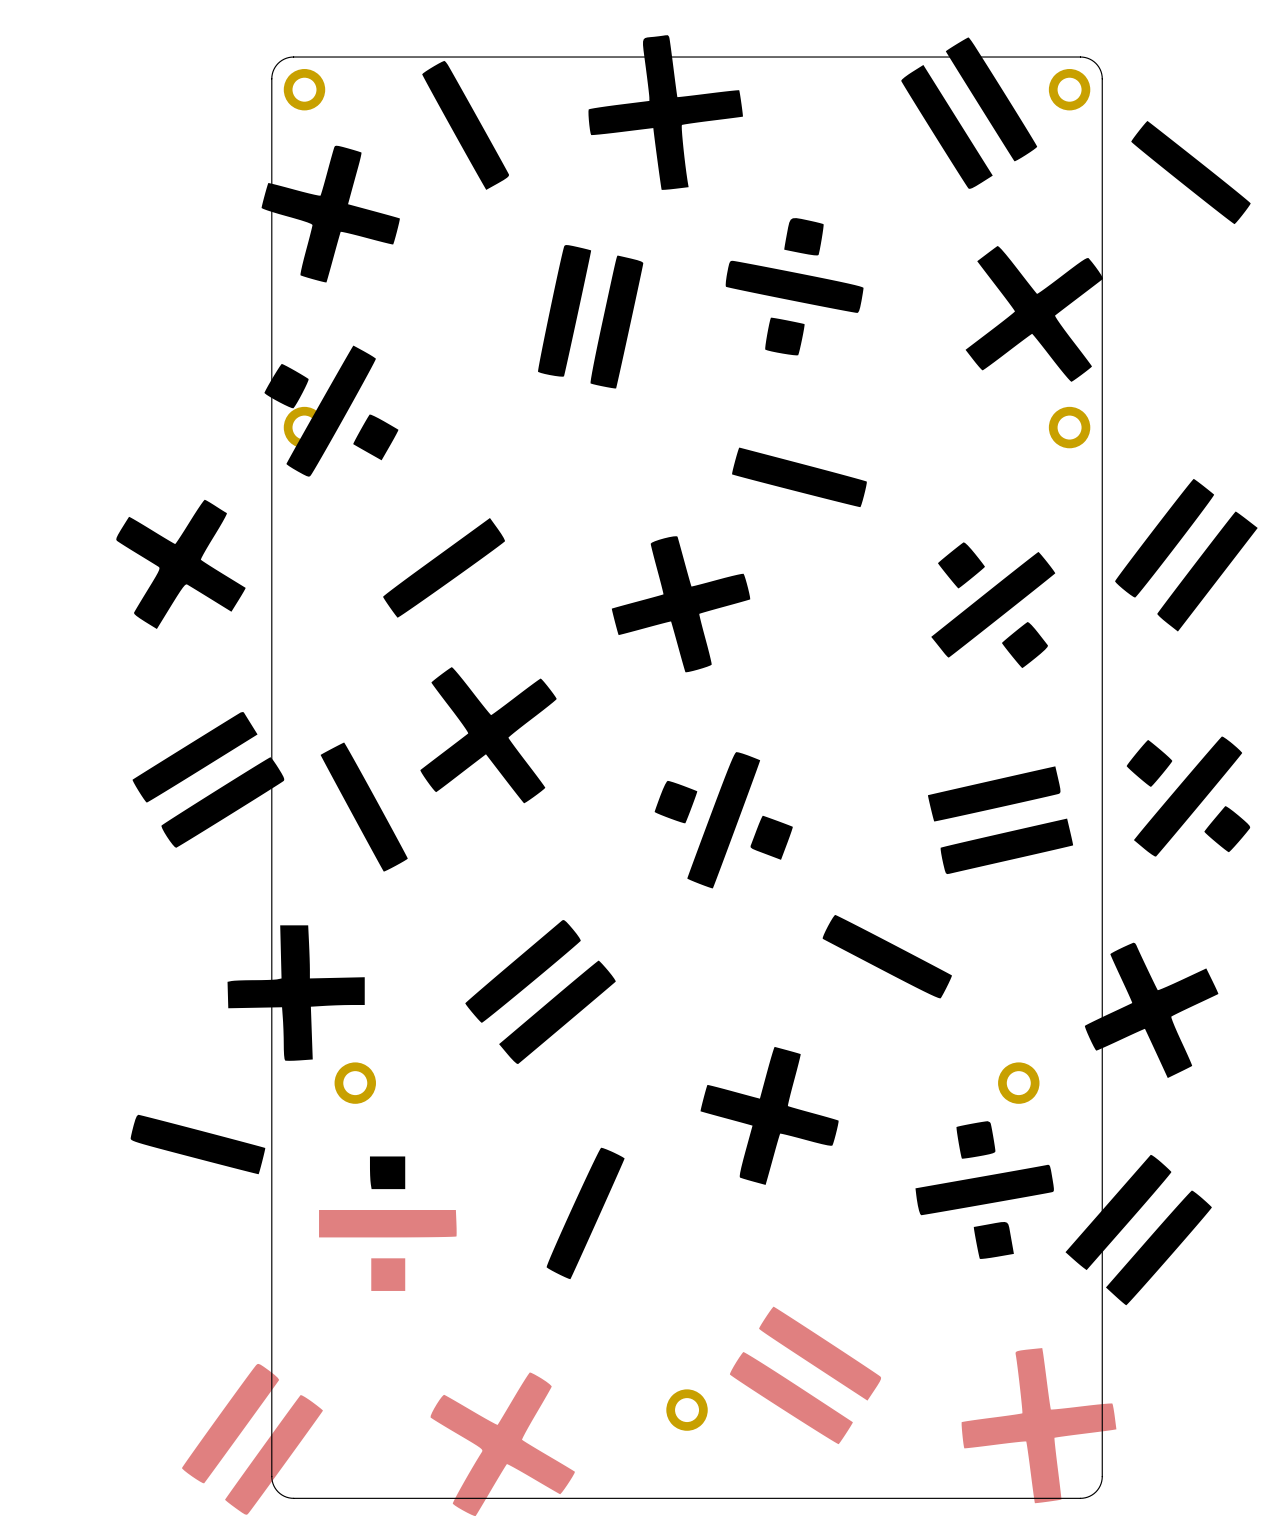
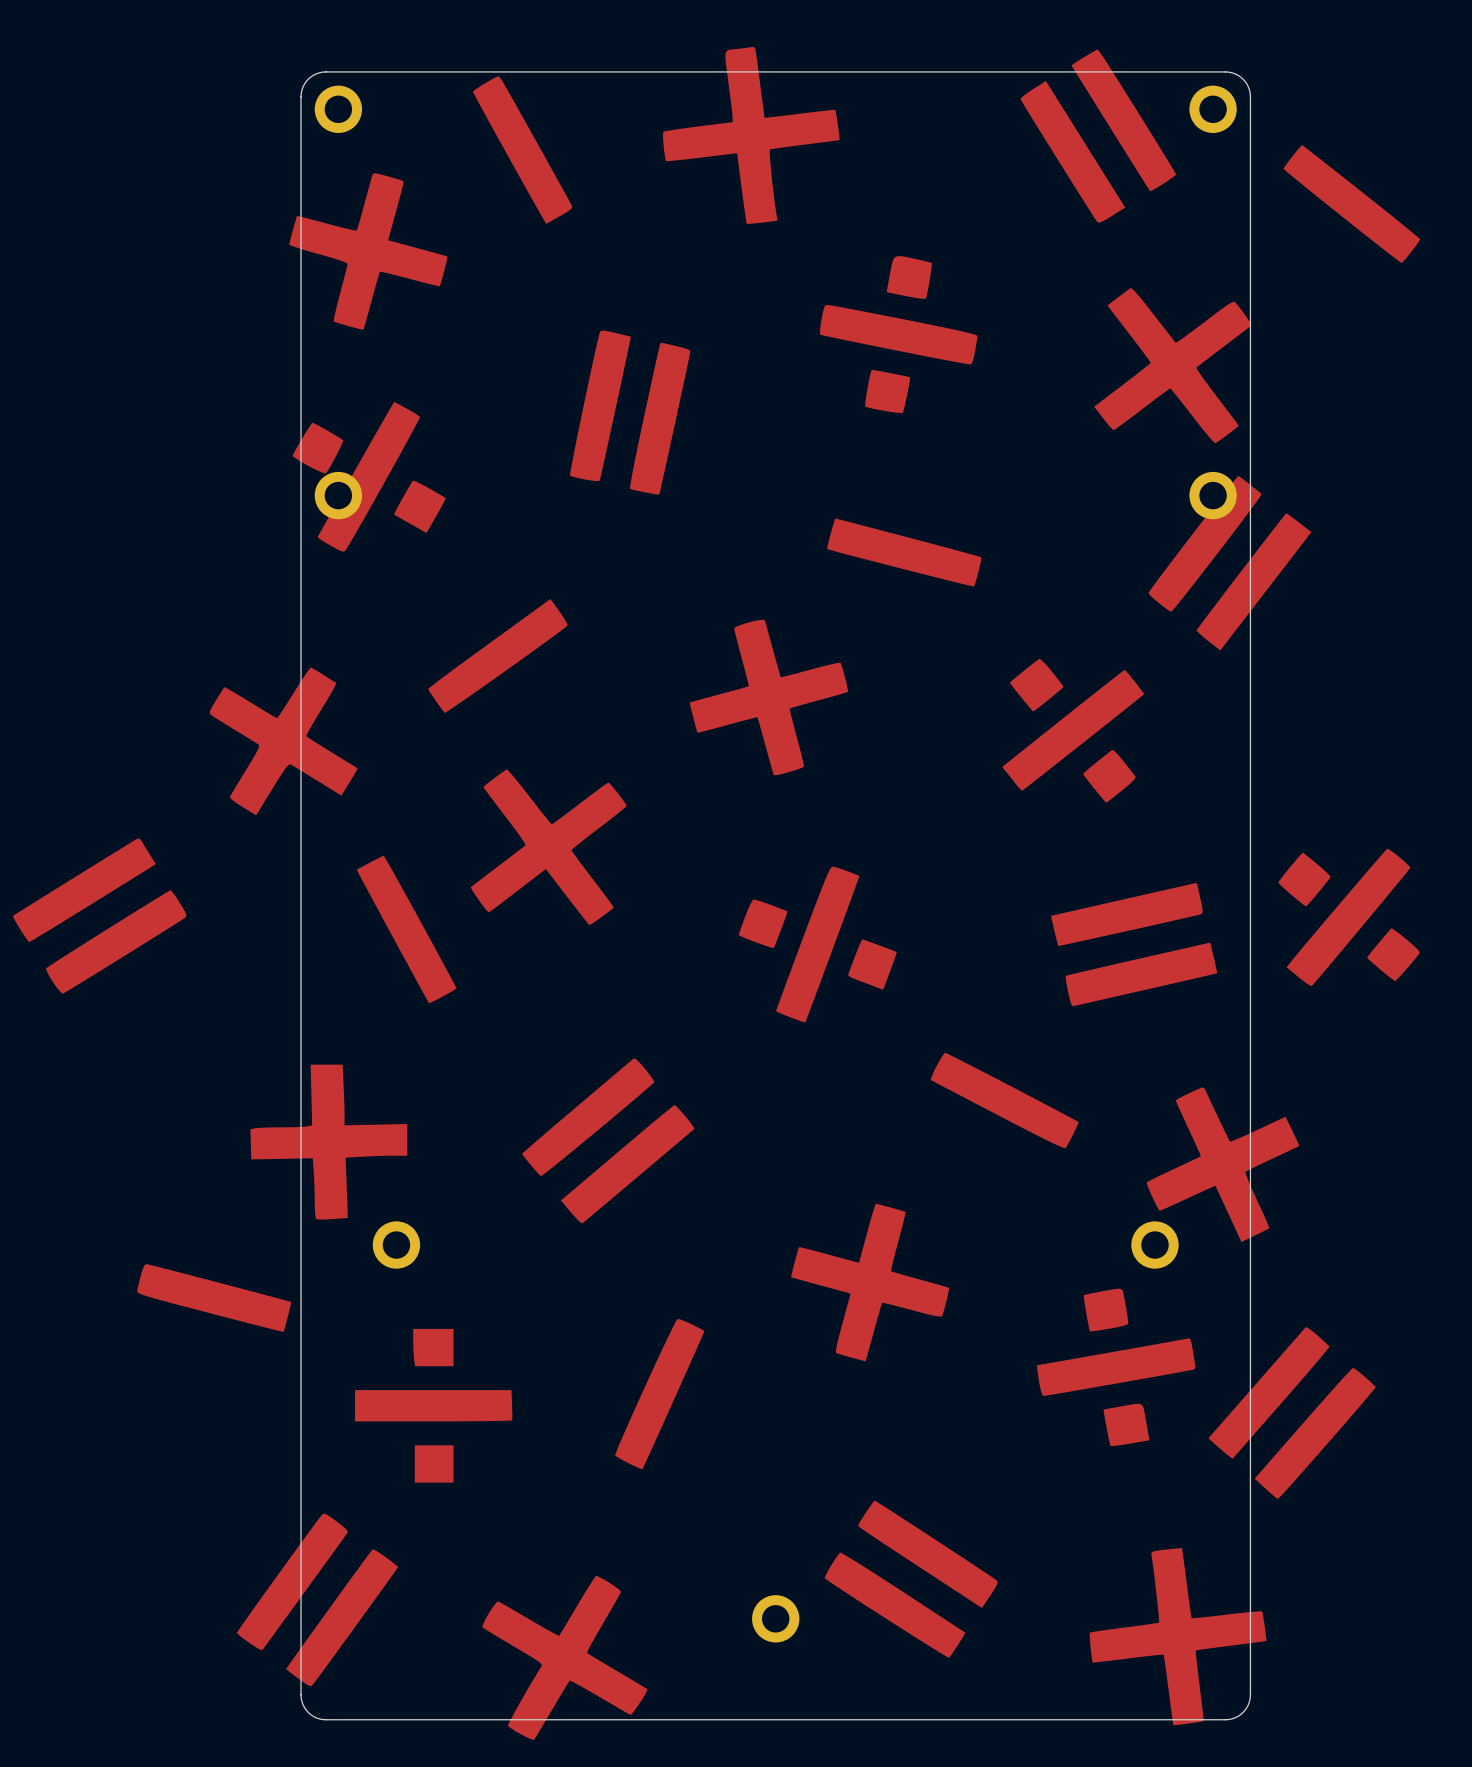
drawing: none -> [12, 47, 1421, 1740]
drawing: [116, 35, 1258, 1517] -> none

